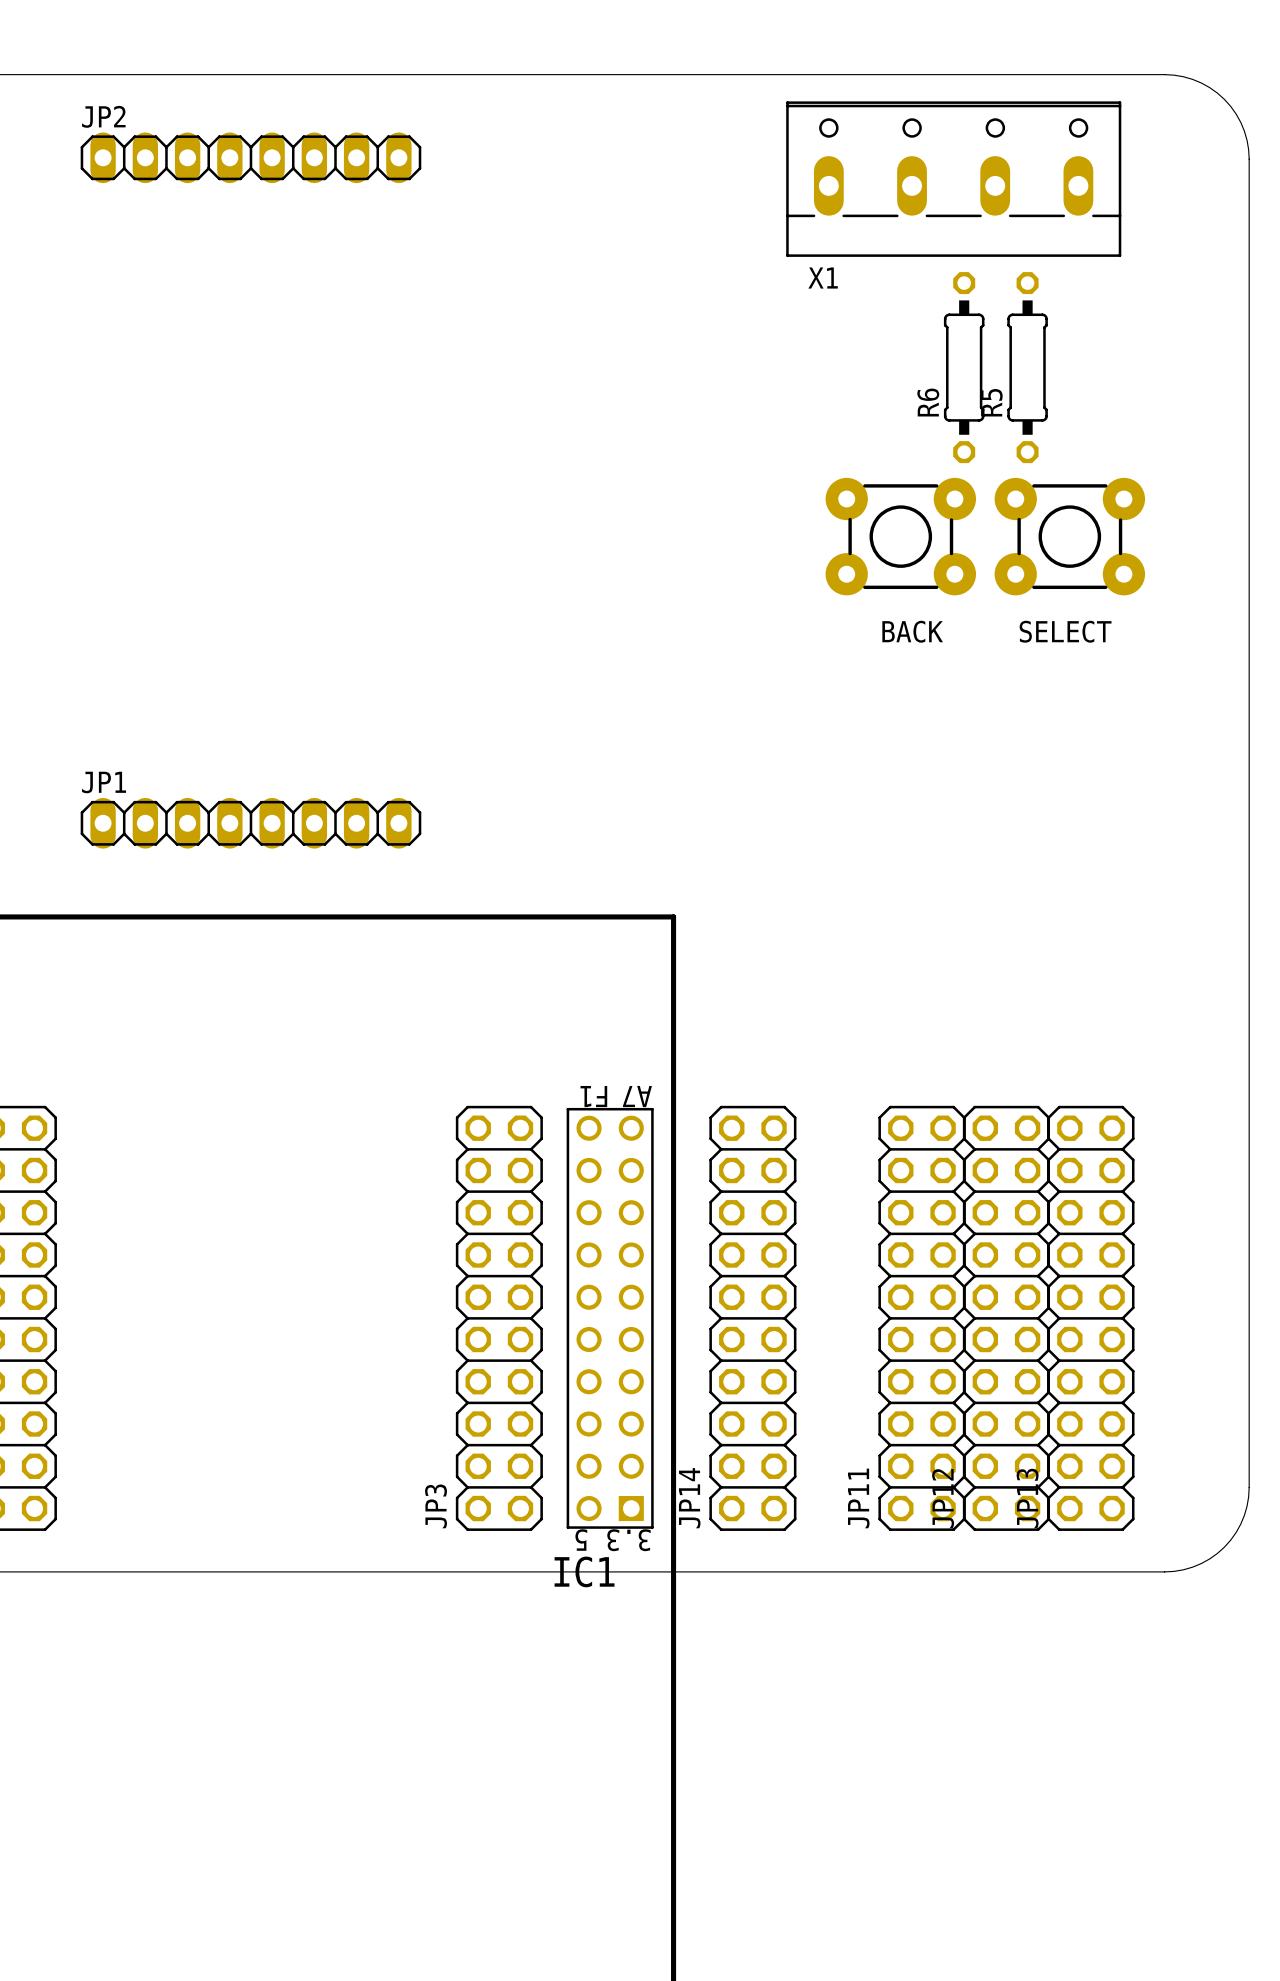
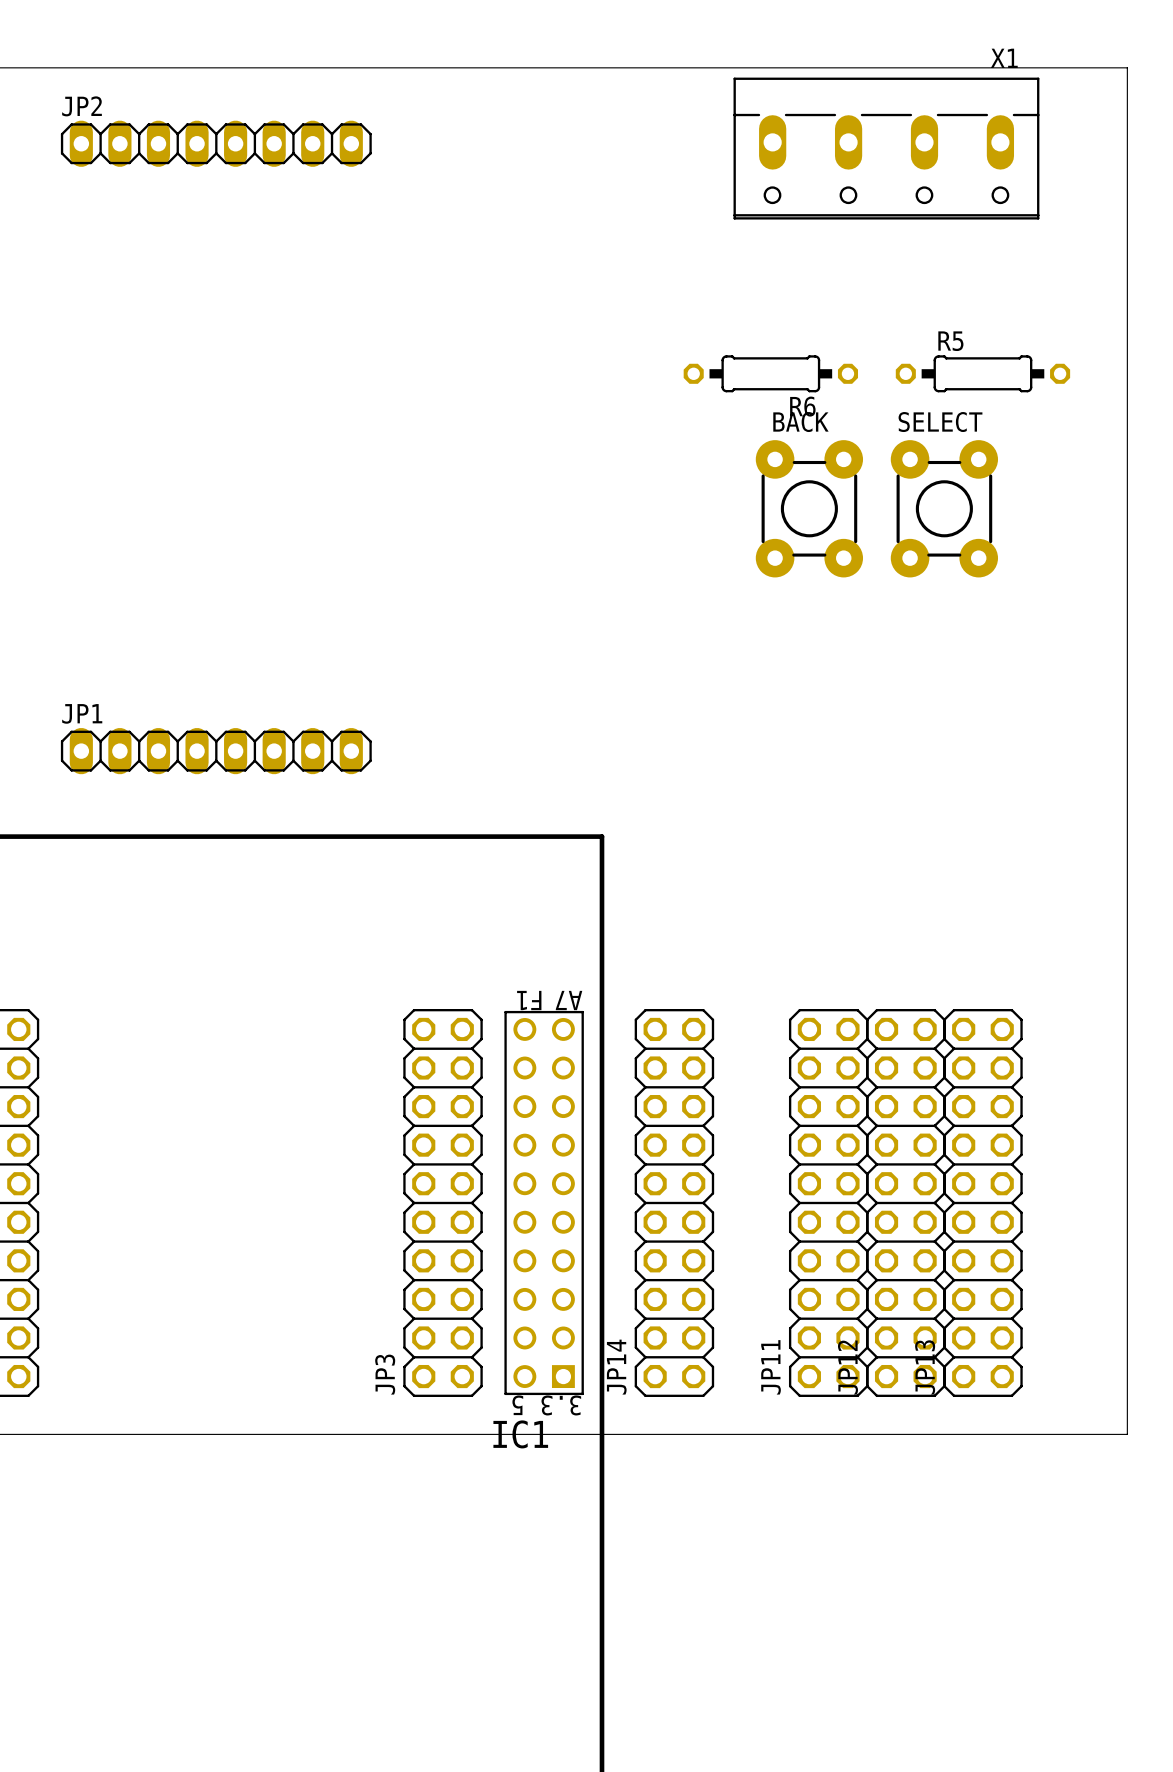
board edge: (1164, 74) (1183, 76) (1201, 82) (1224, 99) (1240, 122) (1247, 140) (1249, 159) -> (1050, 67) (1127, 67) (1127, 144)
X1 rotation: 0° (953, 179) -> 180° (886, 148)
R6 rotation: 0° (964, 367) -> 90° clockwise (770, 373)
R5 rotation: 0° (1027, 367) -> 90° clockwise (982, 373)
R6 name position: R6 (928, 402) -> R6 (802, 406)
BACK rotation: 0° (900, 536) -> 90° clockwise (809, 508)
SELECT rotation: 0° (1069, 536) -> 90° clockwise (944, 508)
BACK name position: BACK (912, 631) -> BACK (800, 422)
SELECT name position: SELECT (1065, 631) -> SELECT (940, 422)
board edge: (1249, 1487) (1247, 1506) (1240, 1524) (1224, 1547) (1201, 1563) (1183, 1569) (1164, 1571) -> (1127, 1357) (1127, 1434) (1050, 1434)

